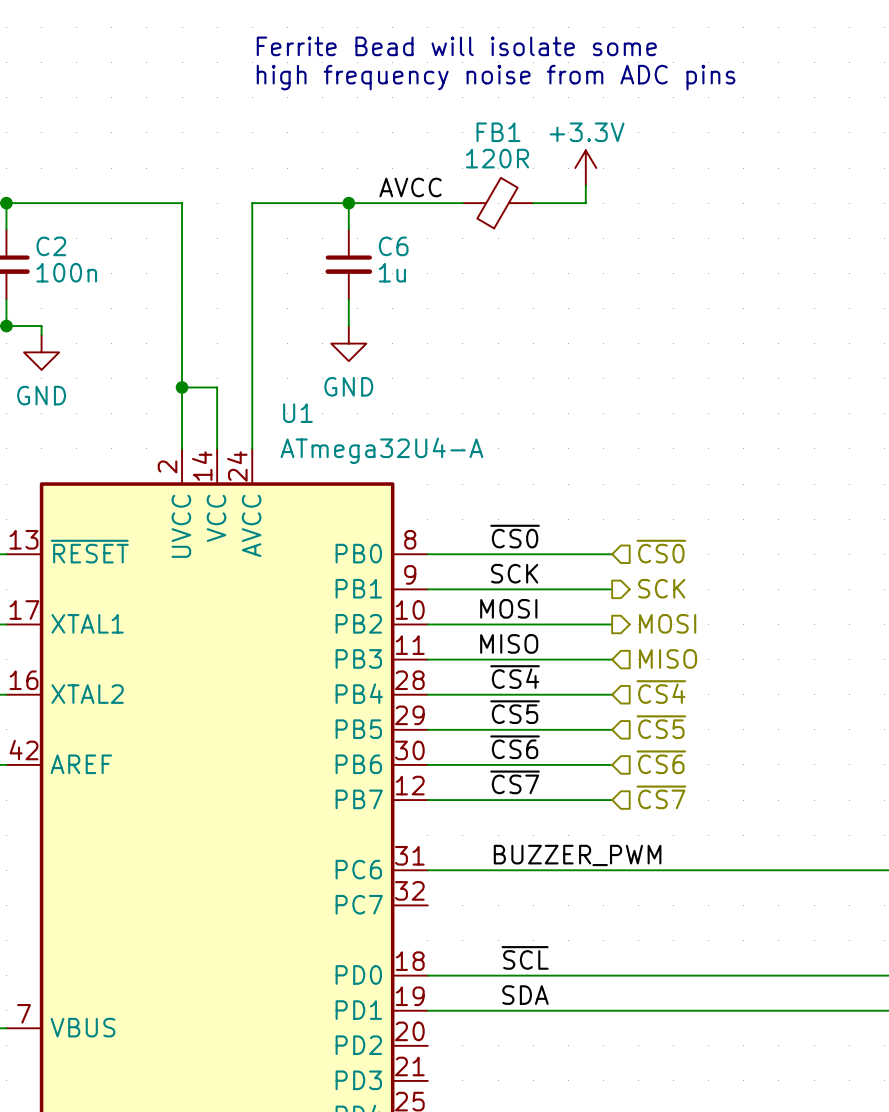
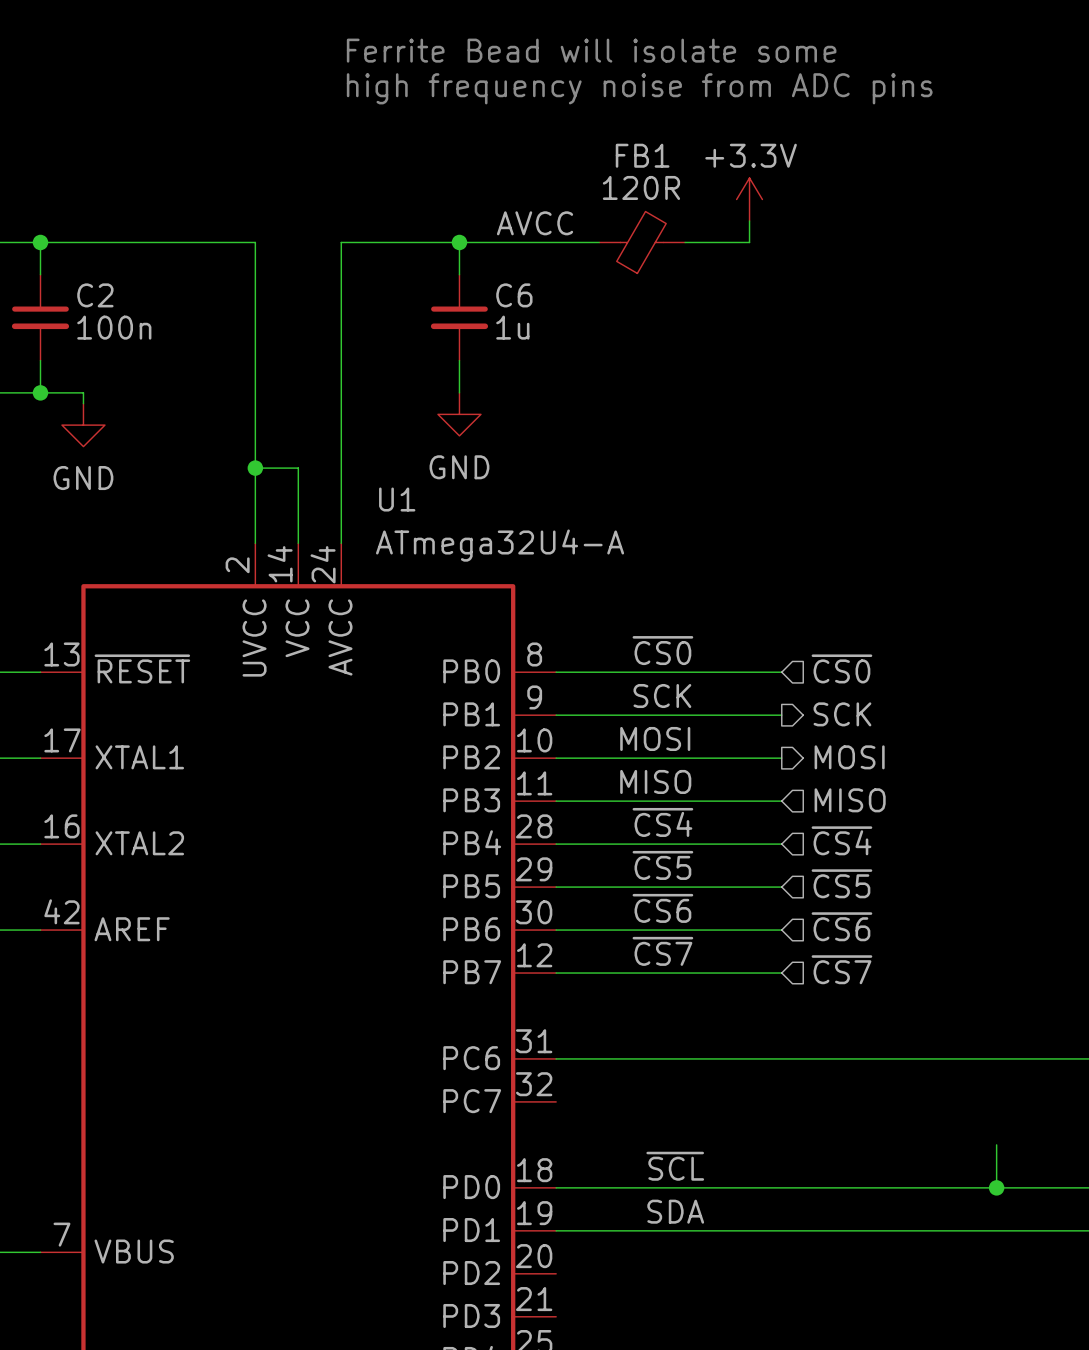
label: BUZZER_PWM (577, 855) -> none
wire: none -> (996, 1144) (996, 1187)
junction: none -> (996, 1187)

